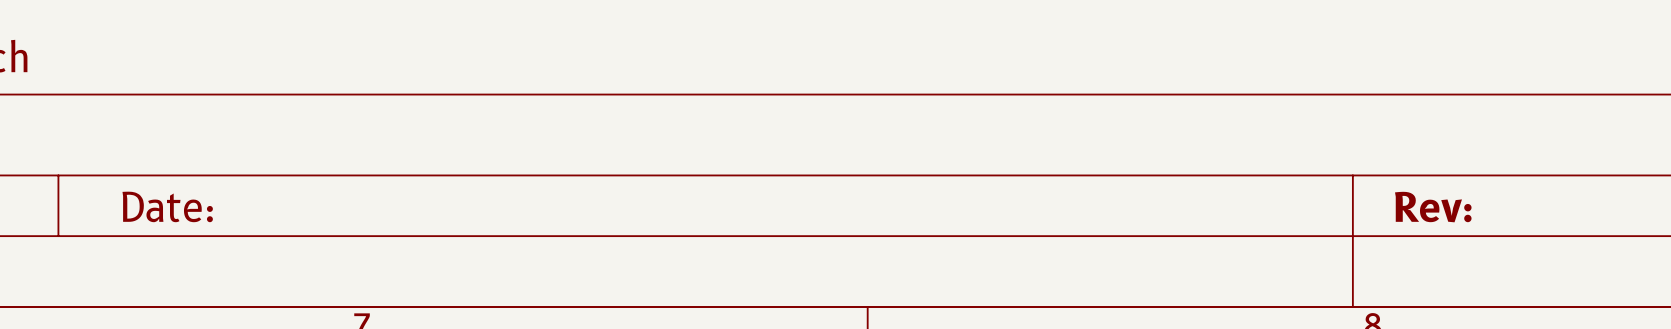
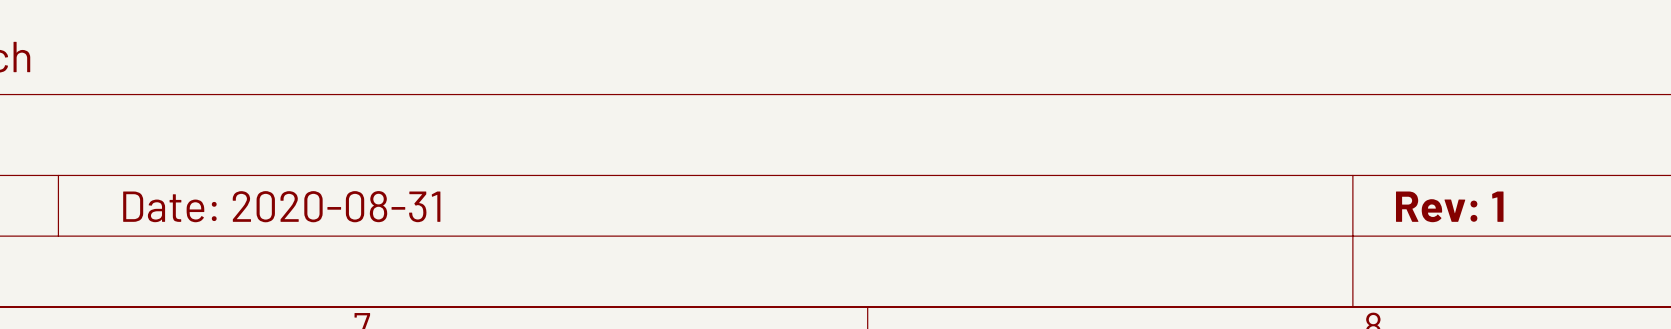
title block: Date: (167, 206) -> Date: 2020-08-31 (281, 206)
title block: Rev: (1433, 207) -> Rev: 1 (1449, 206)

